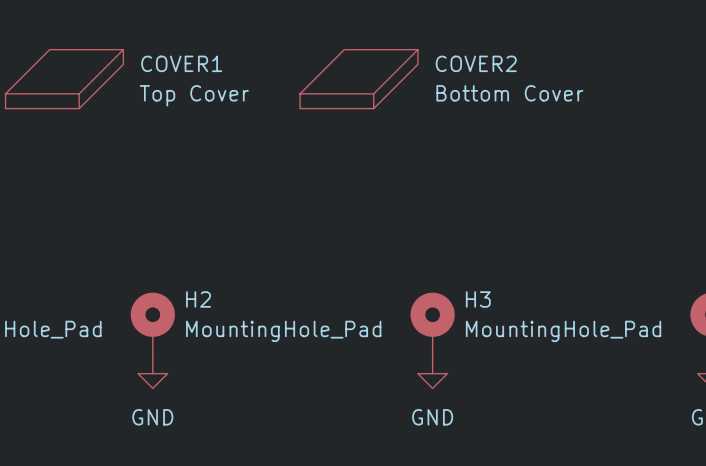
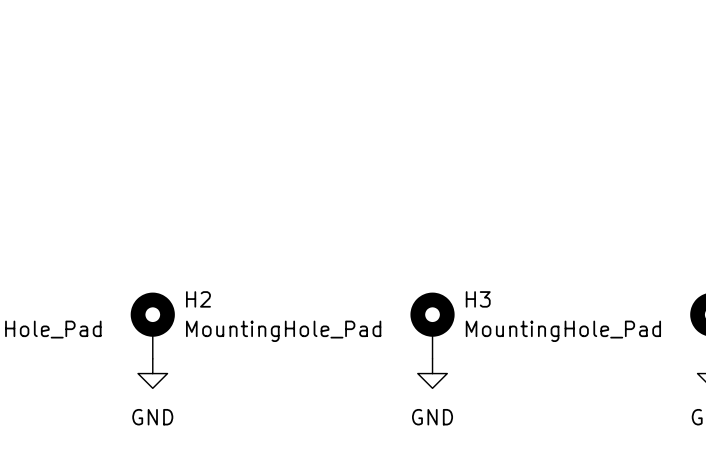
COVER1: Top Cover (64, 79) -> none
COVER2: Bottom Cover (358, 79) -> none

